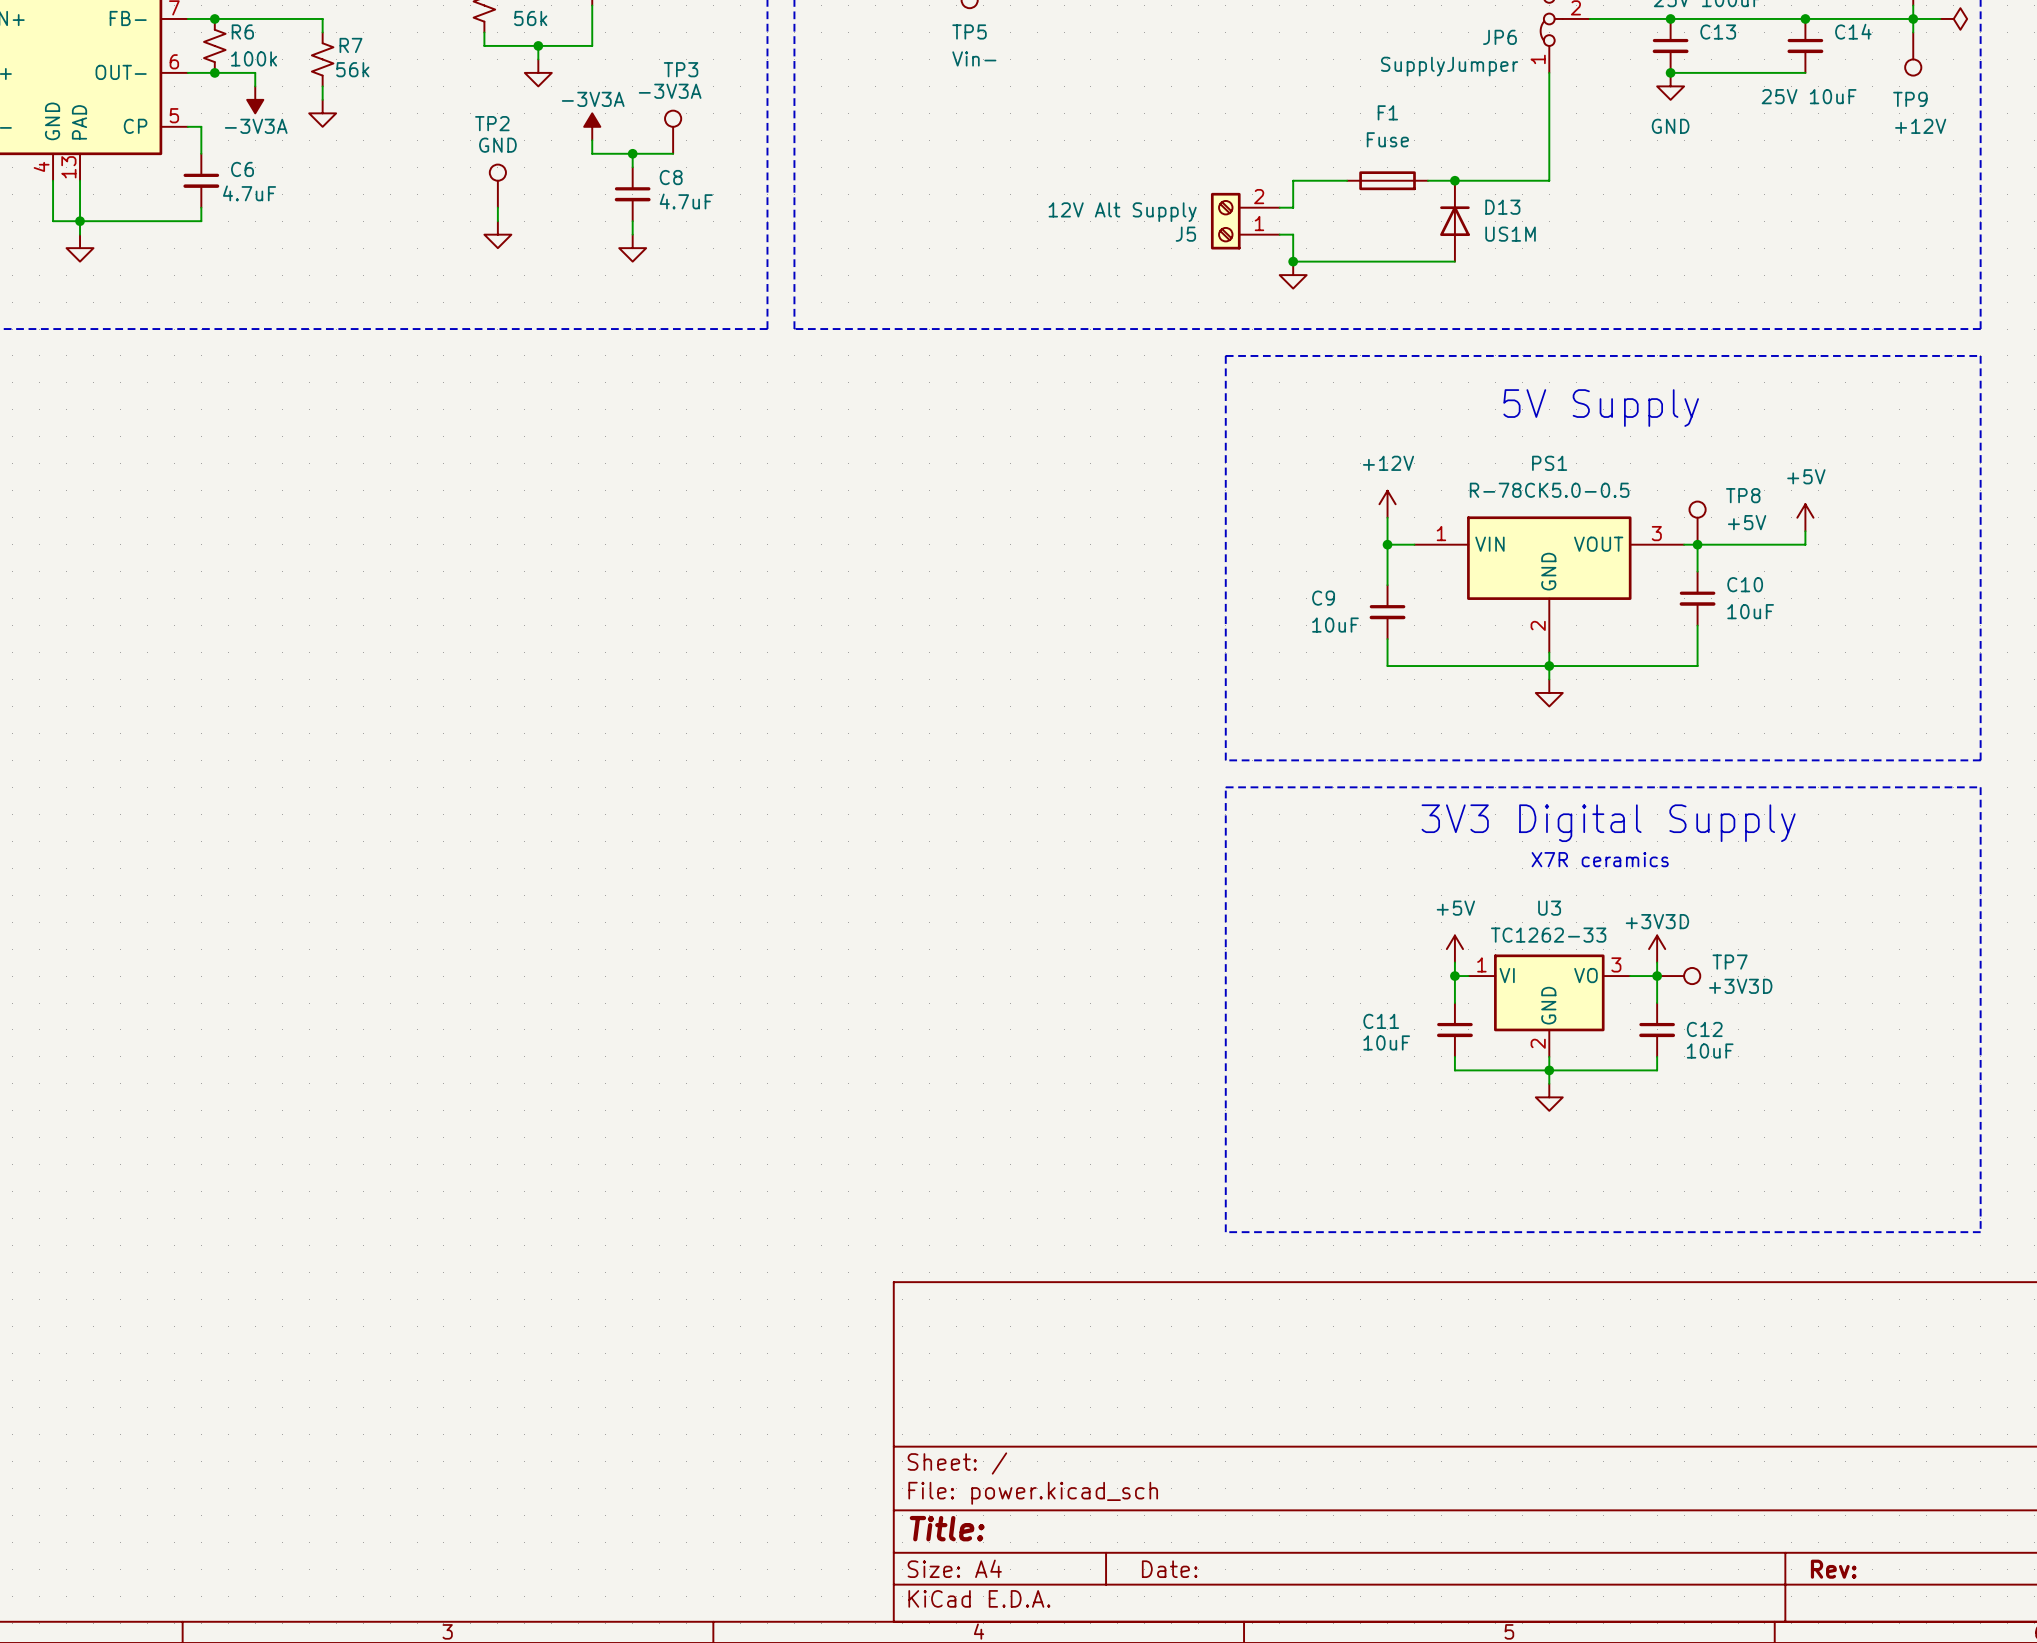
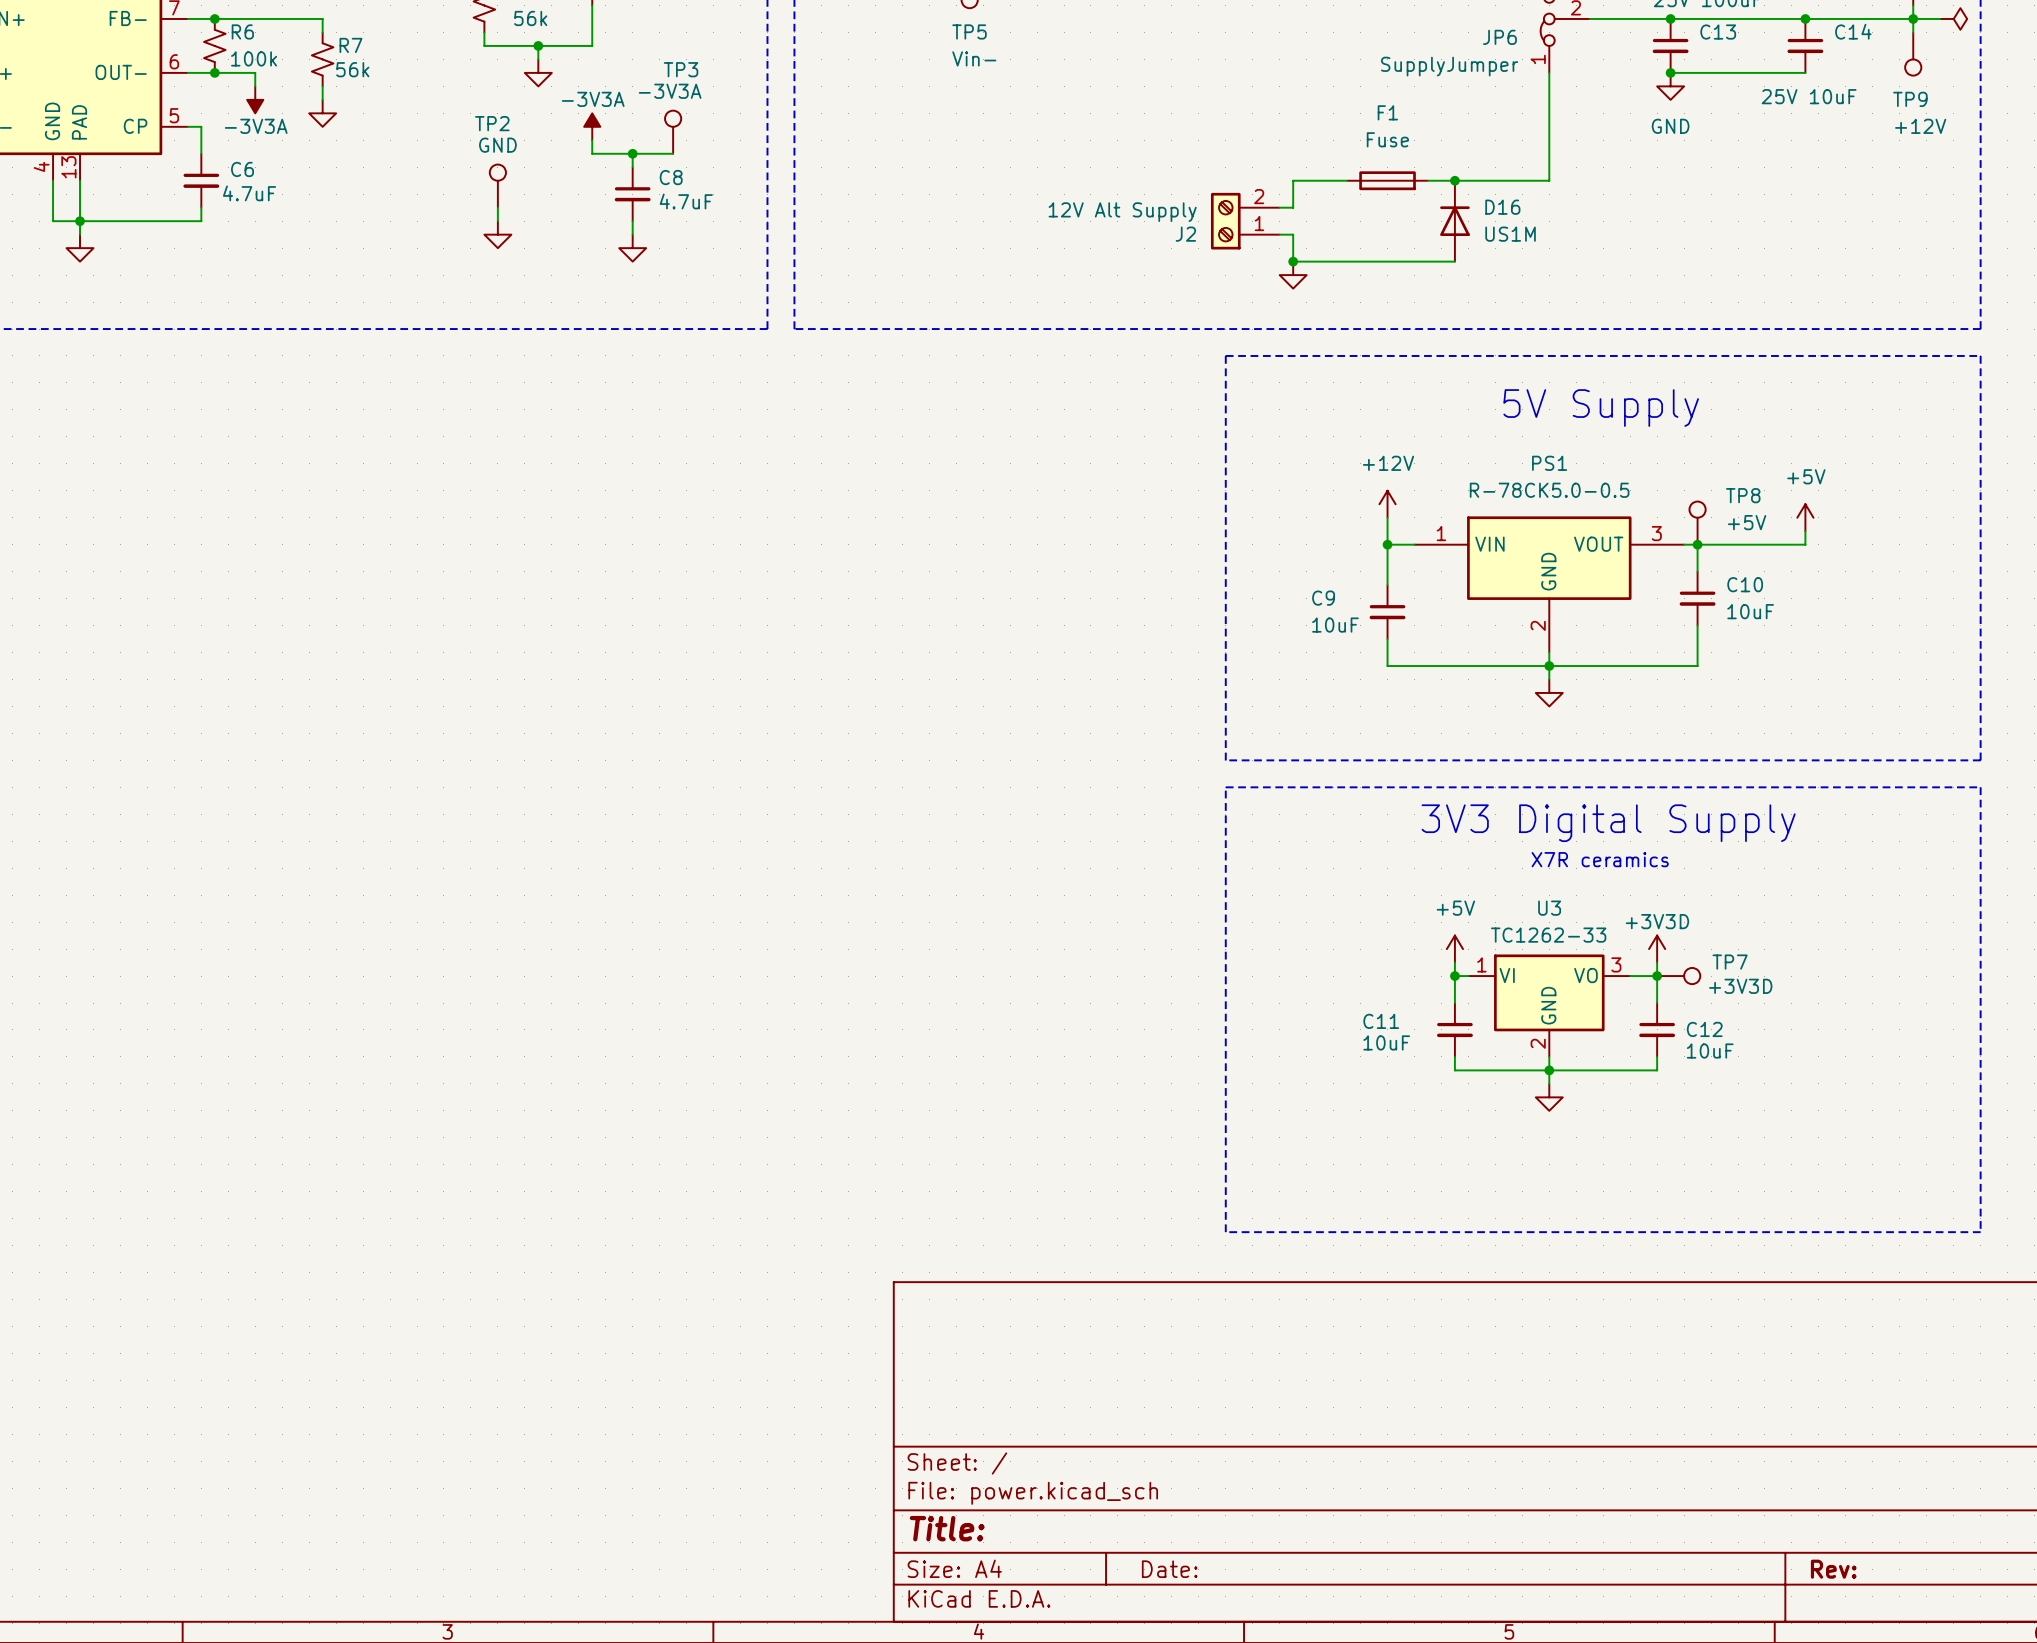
D13 name: D13 (1502, 207) -> D16 (1502, 207)
J5 name: J5 (1185, 234) -> J2 (1185, 234)

